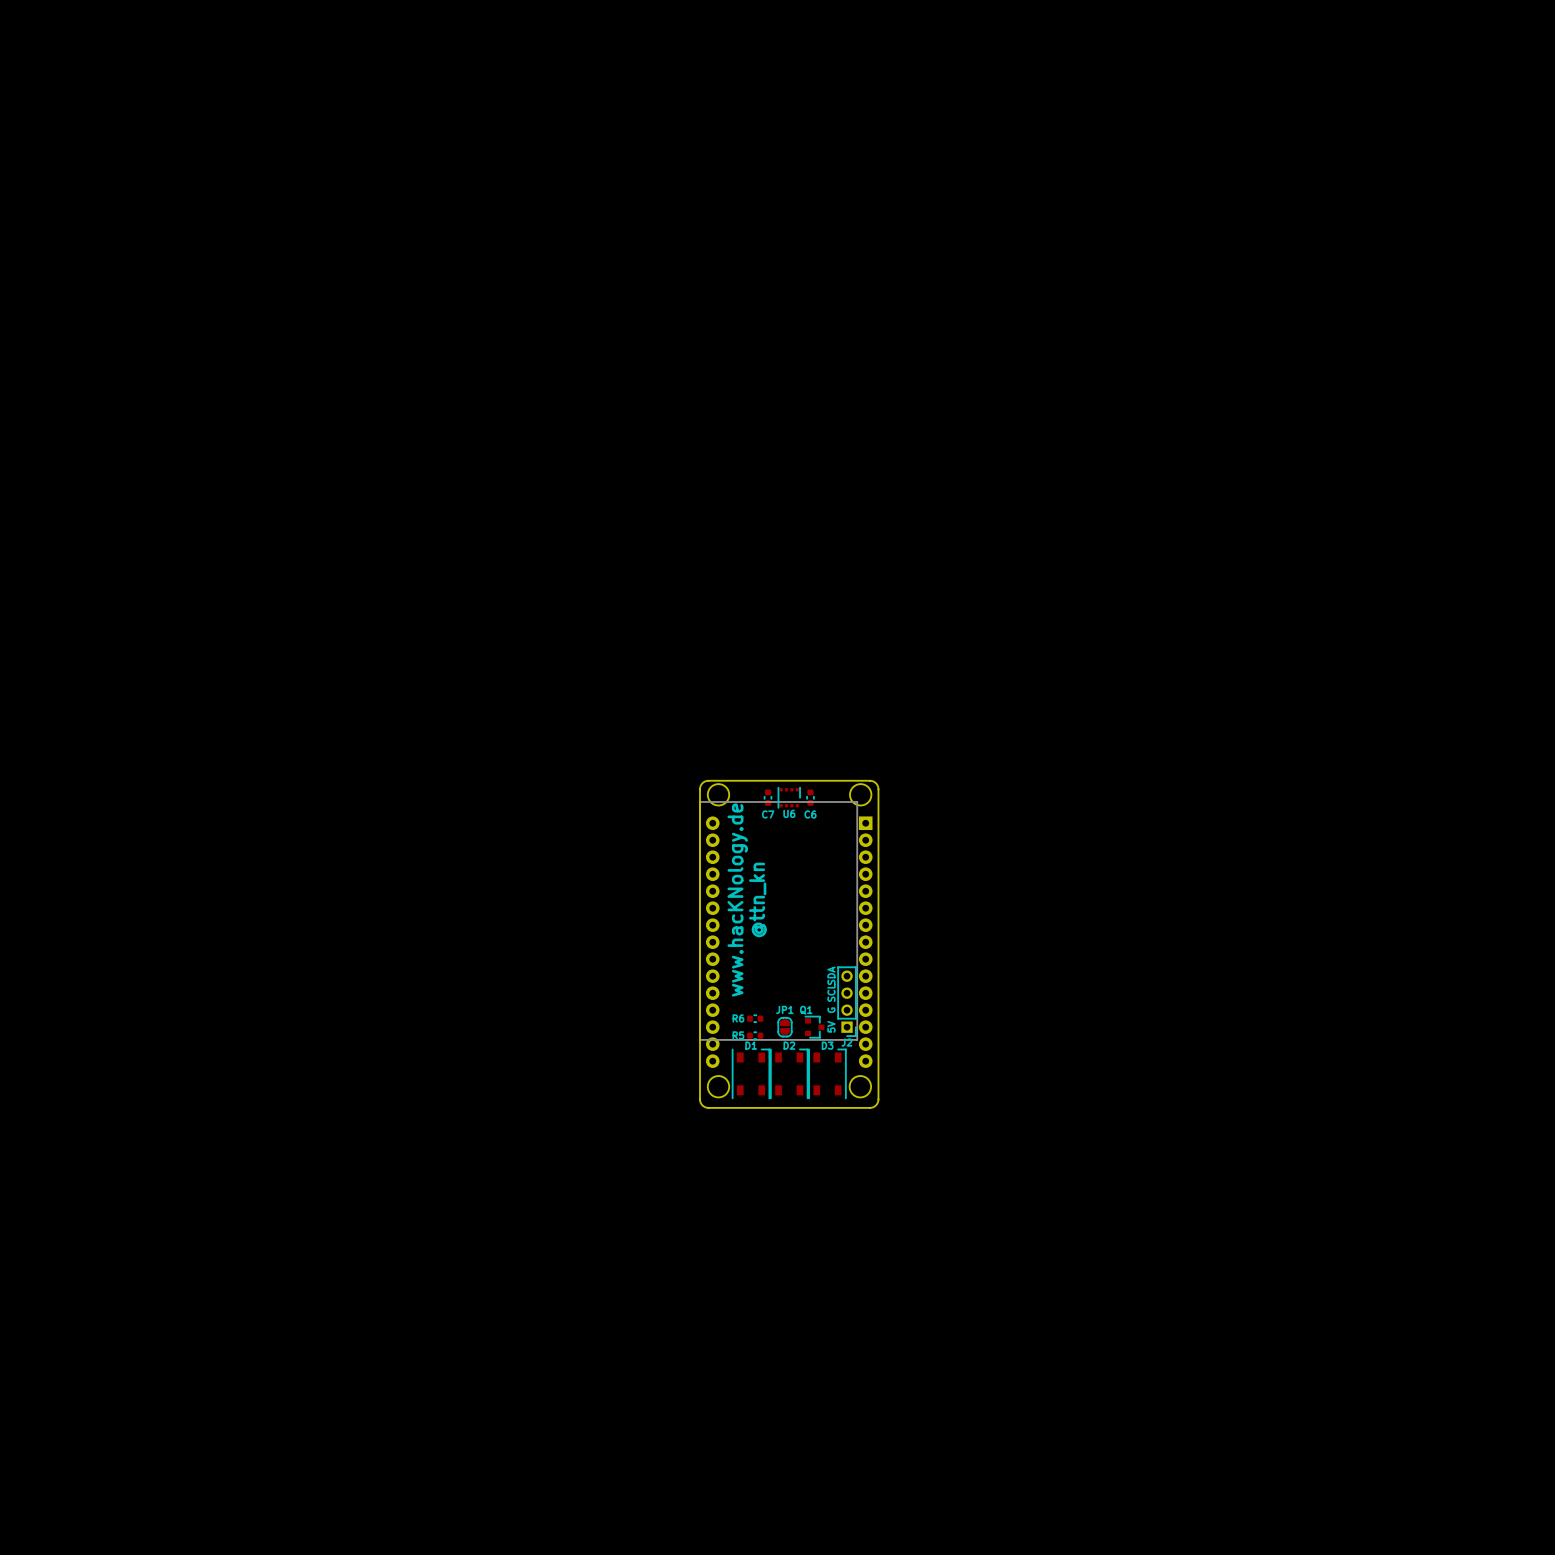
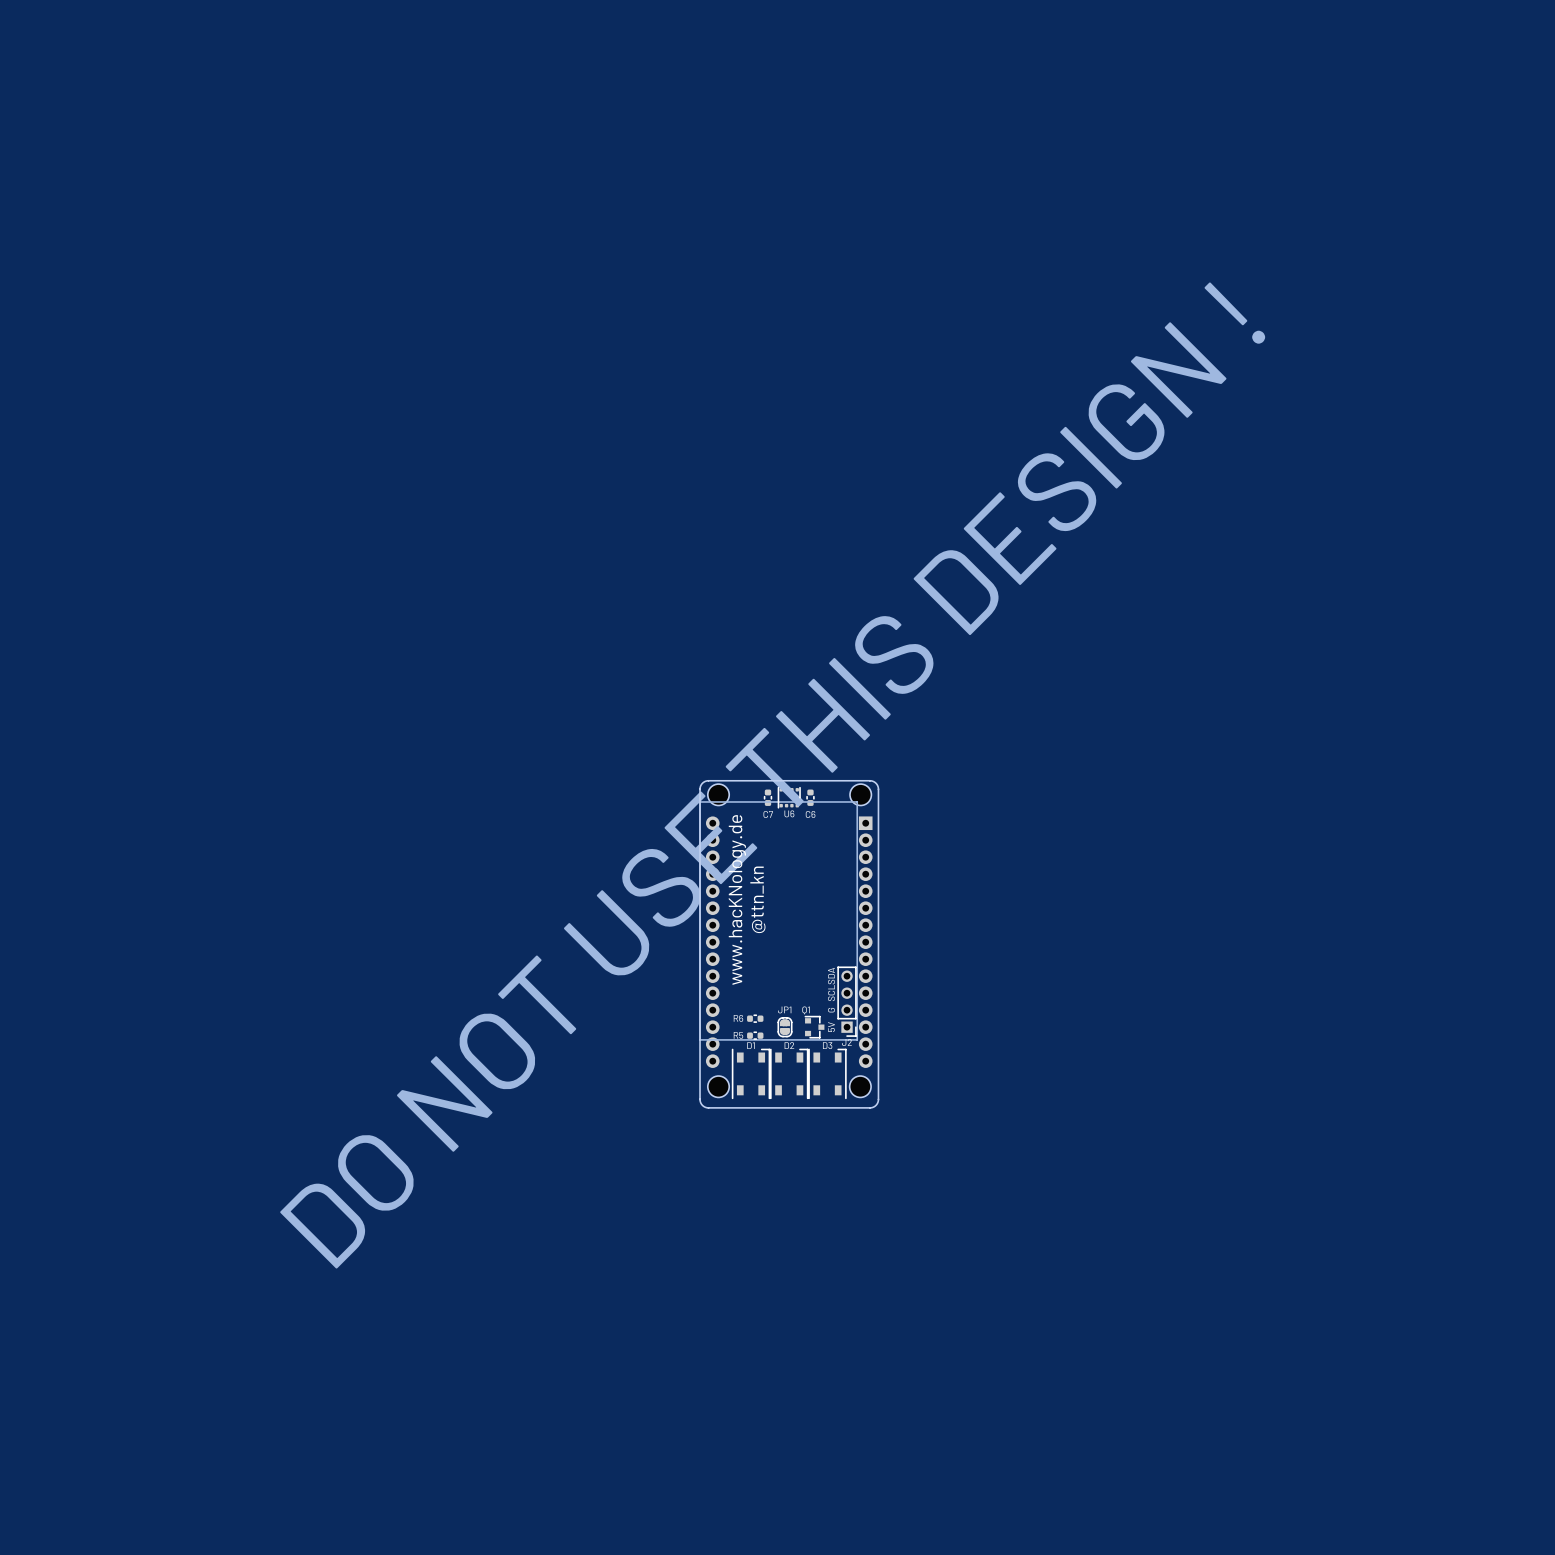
text: none -> DO NOT USE THIS DESIGN ! (772, 775)

